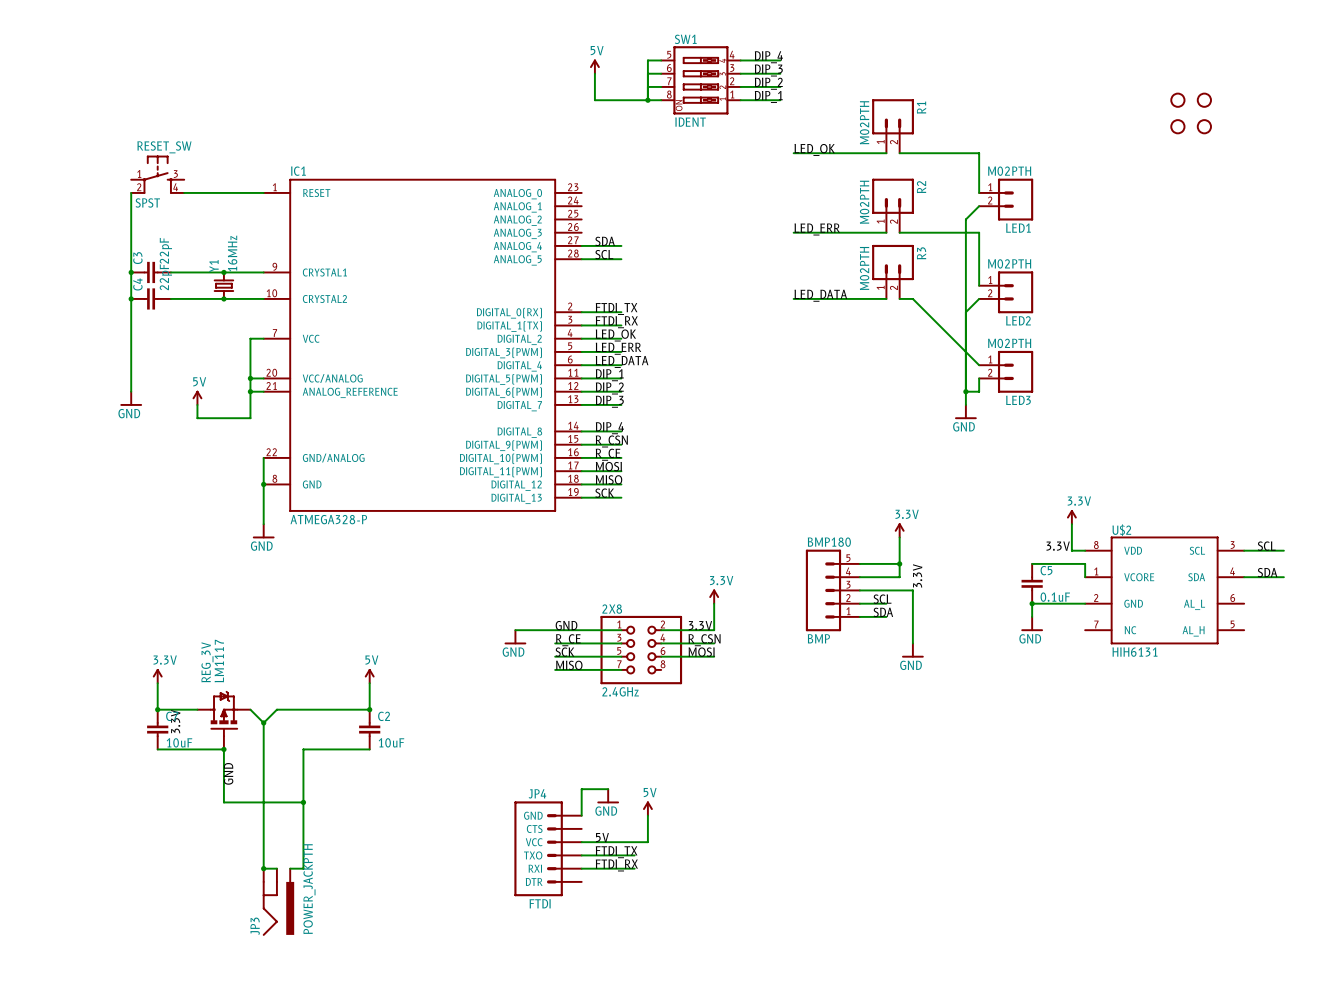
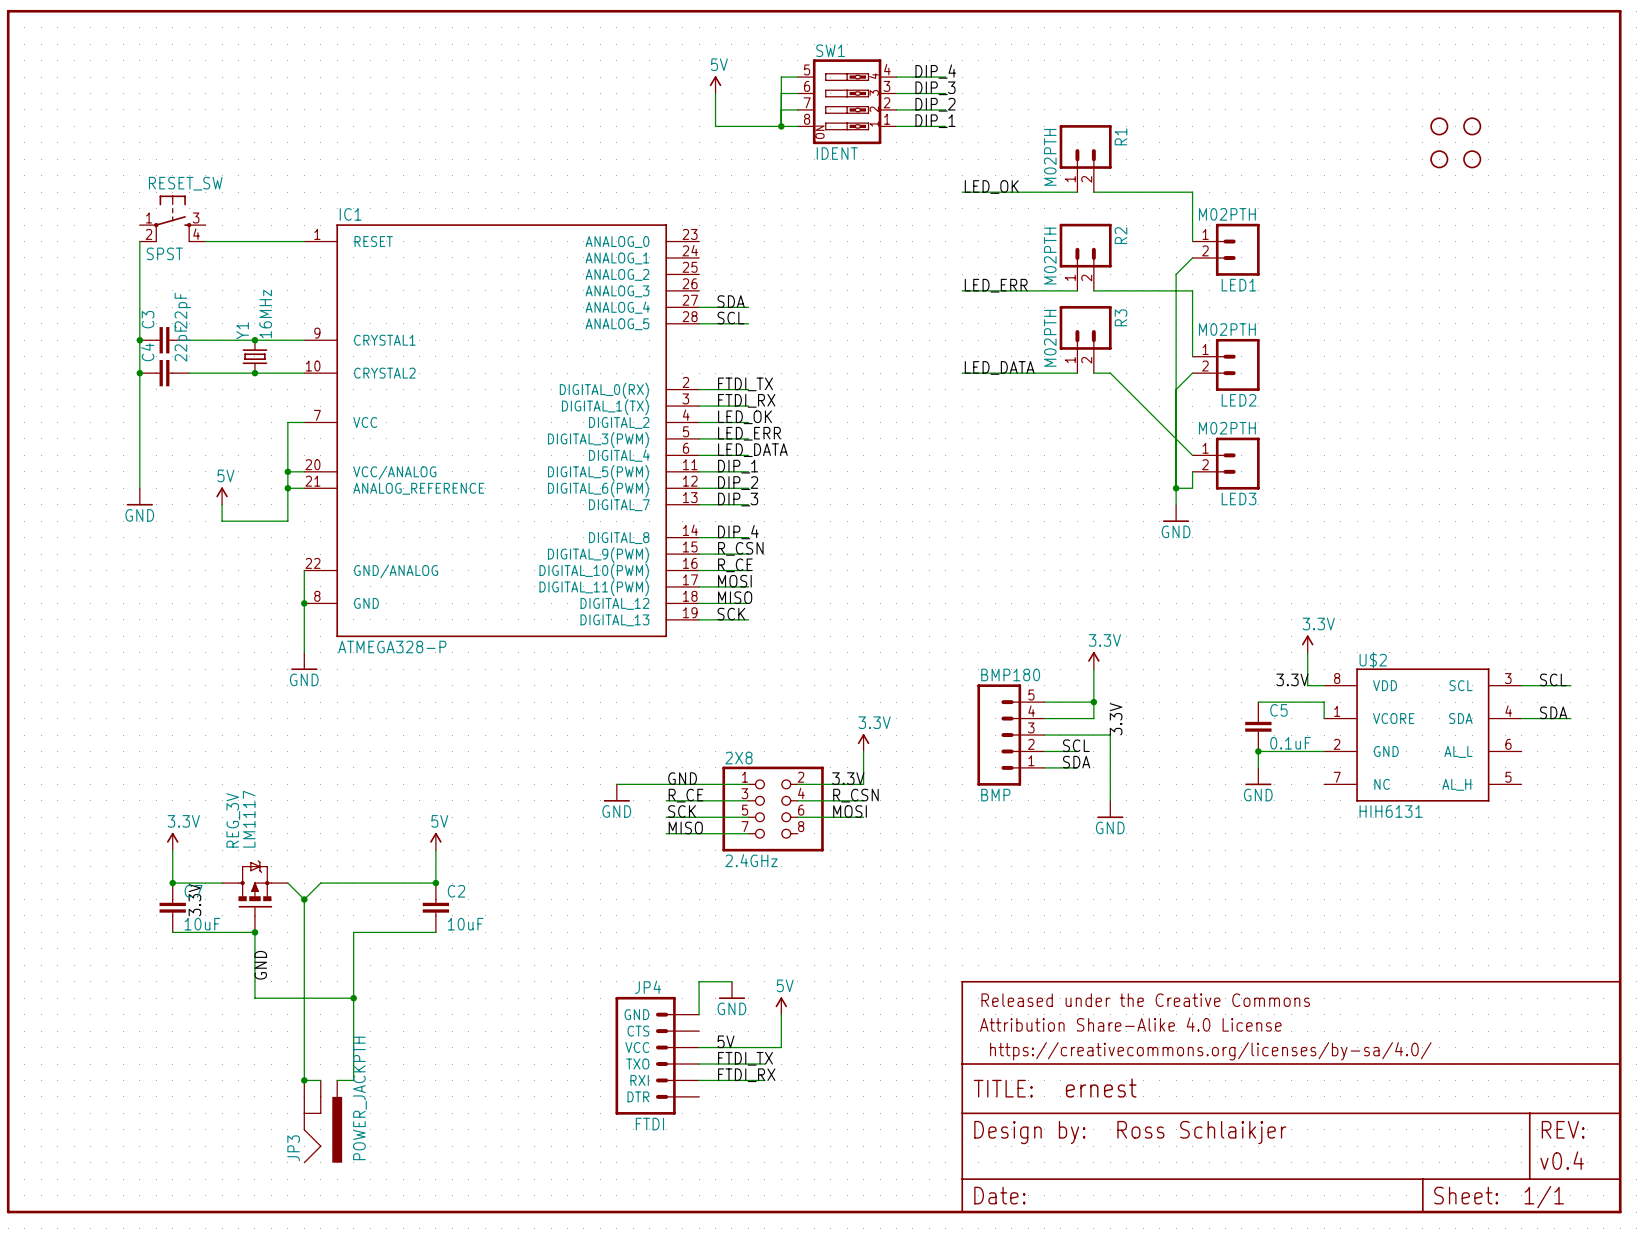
part: none -> (814, 611)
part: none -> (1291, 1096)

